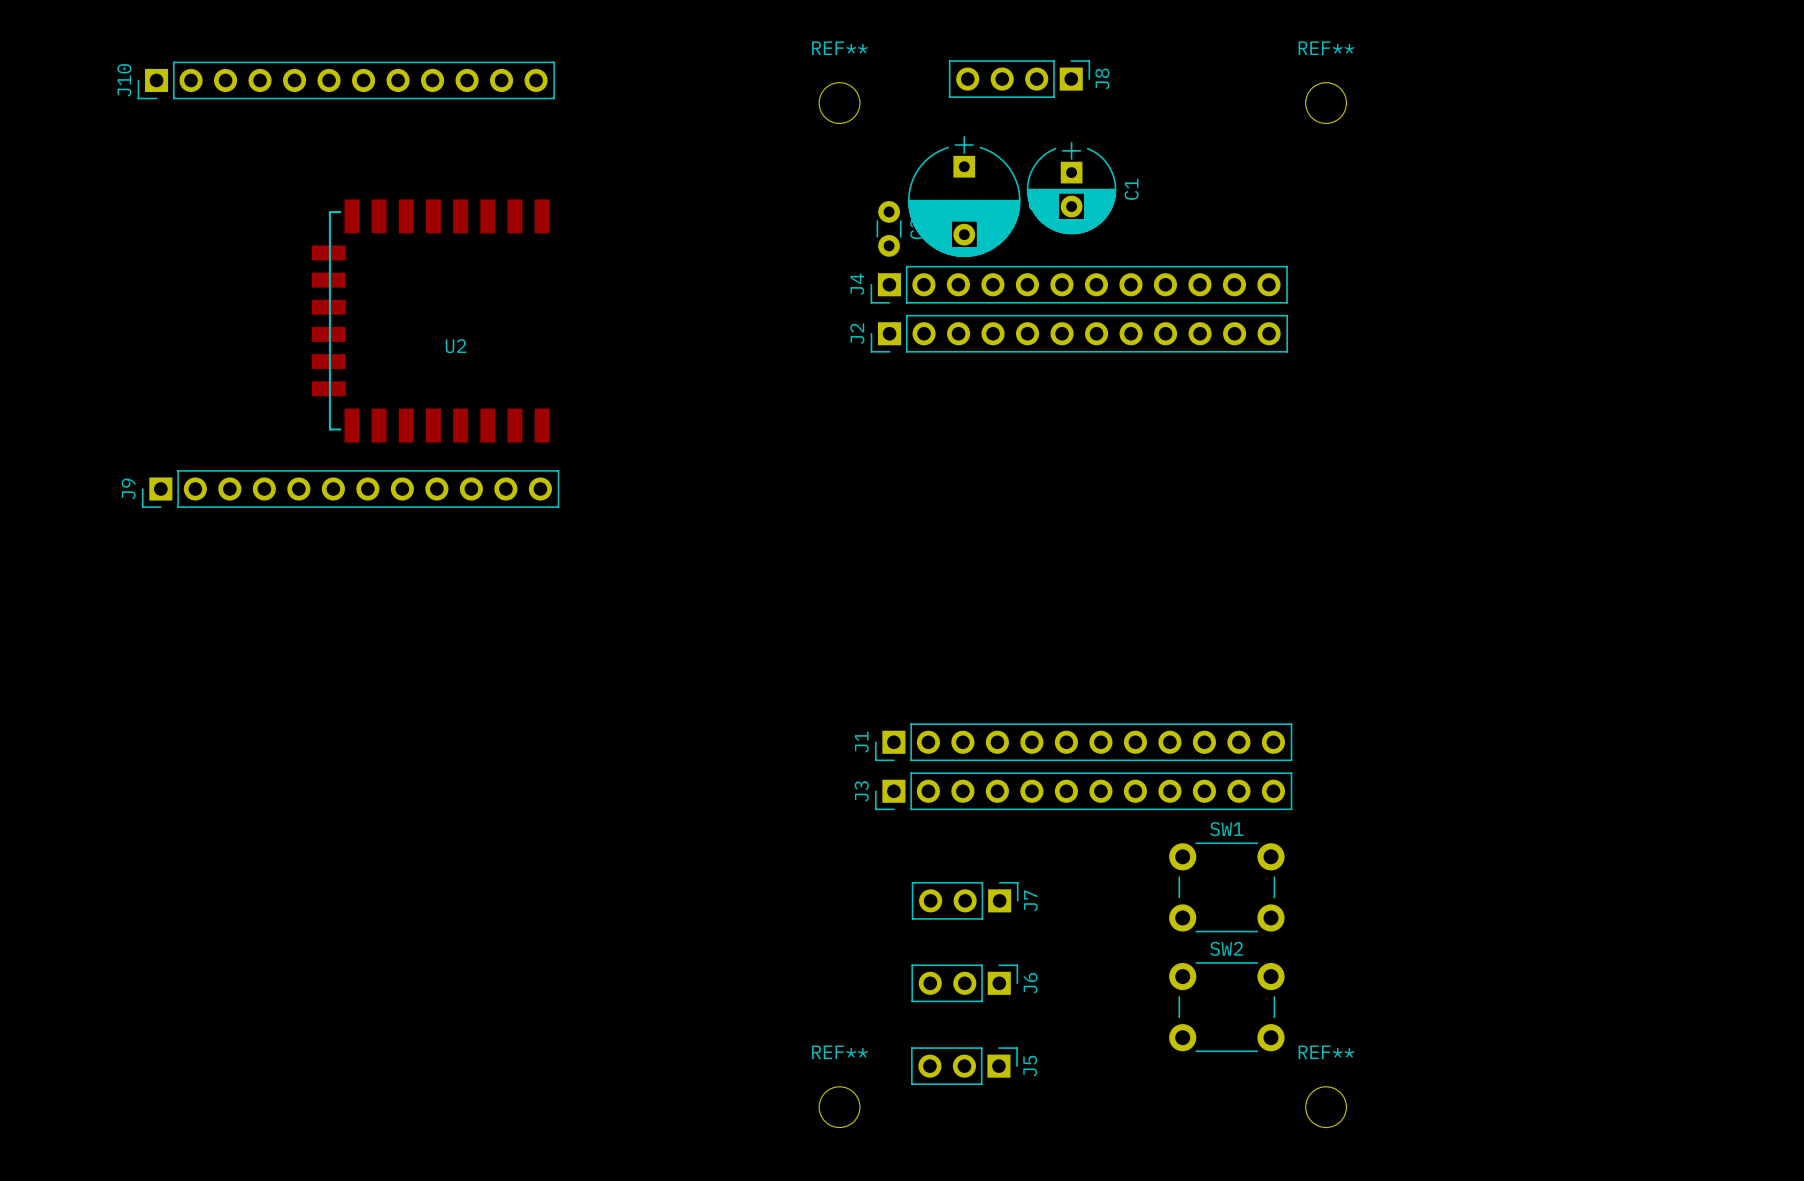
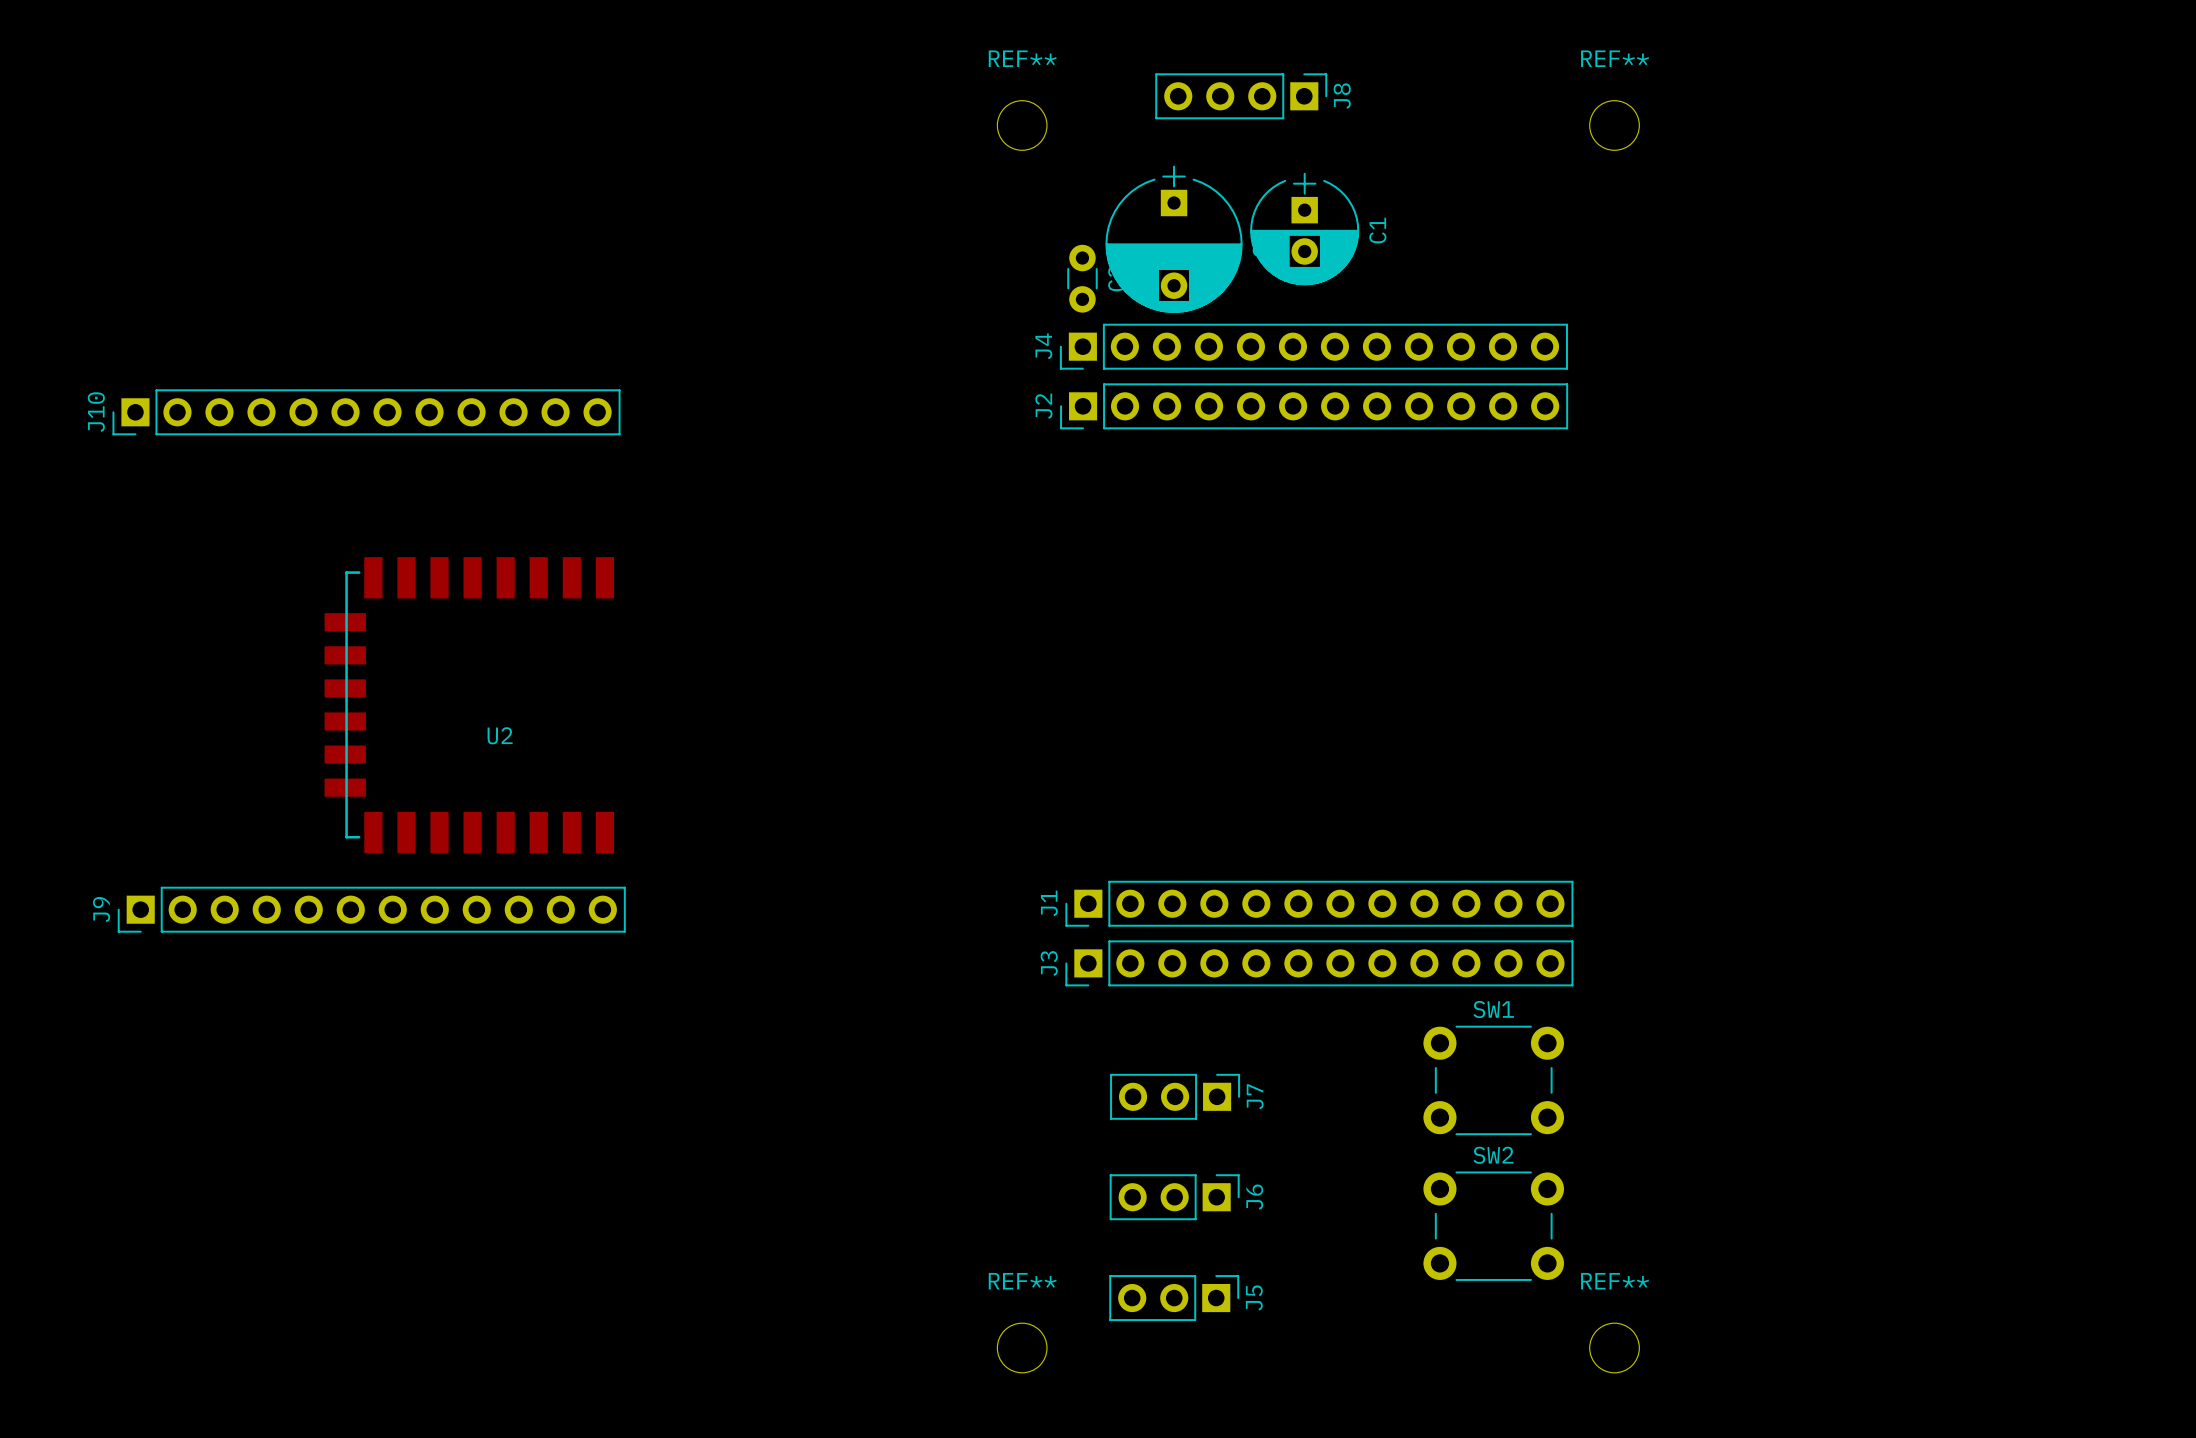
J10 position: (346, 80) -> (366, 412)
U2 position: (430, 321) -> (469, 705)
J9 position: (350, 489) -> (371, 909)

